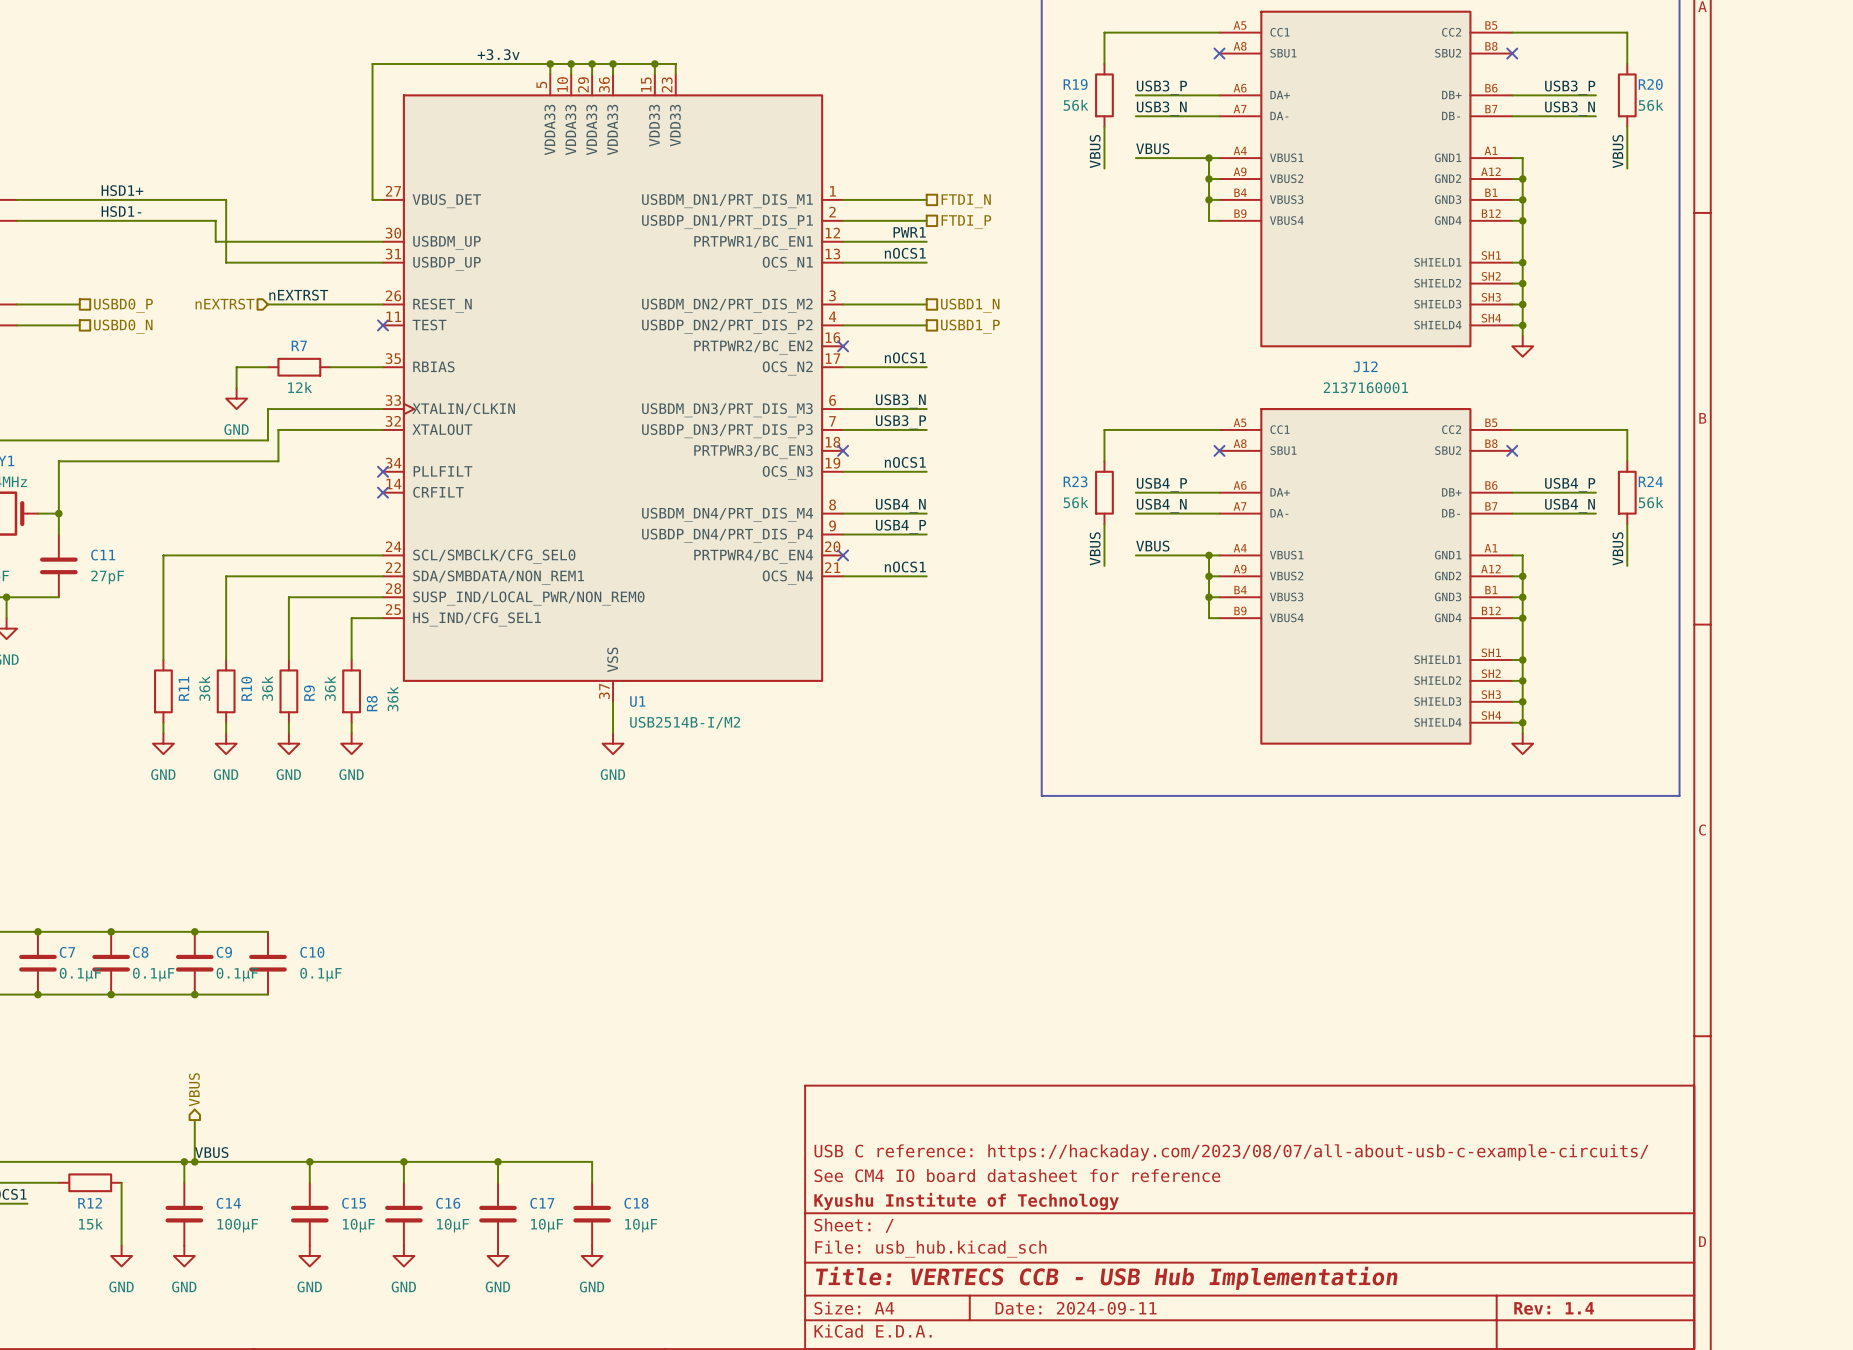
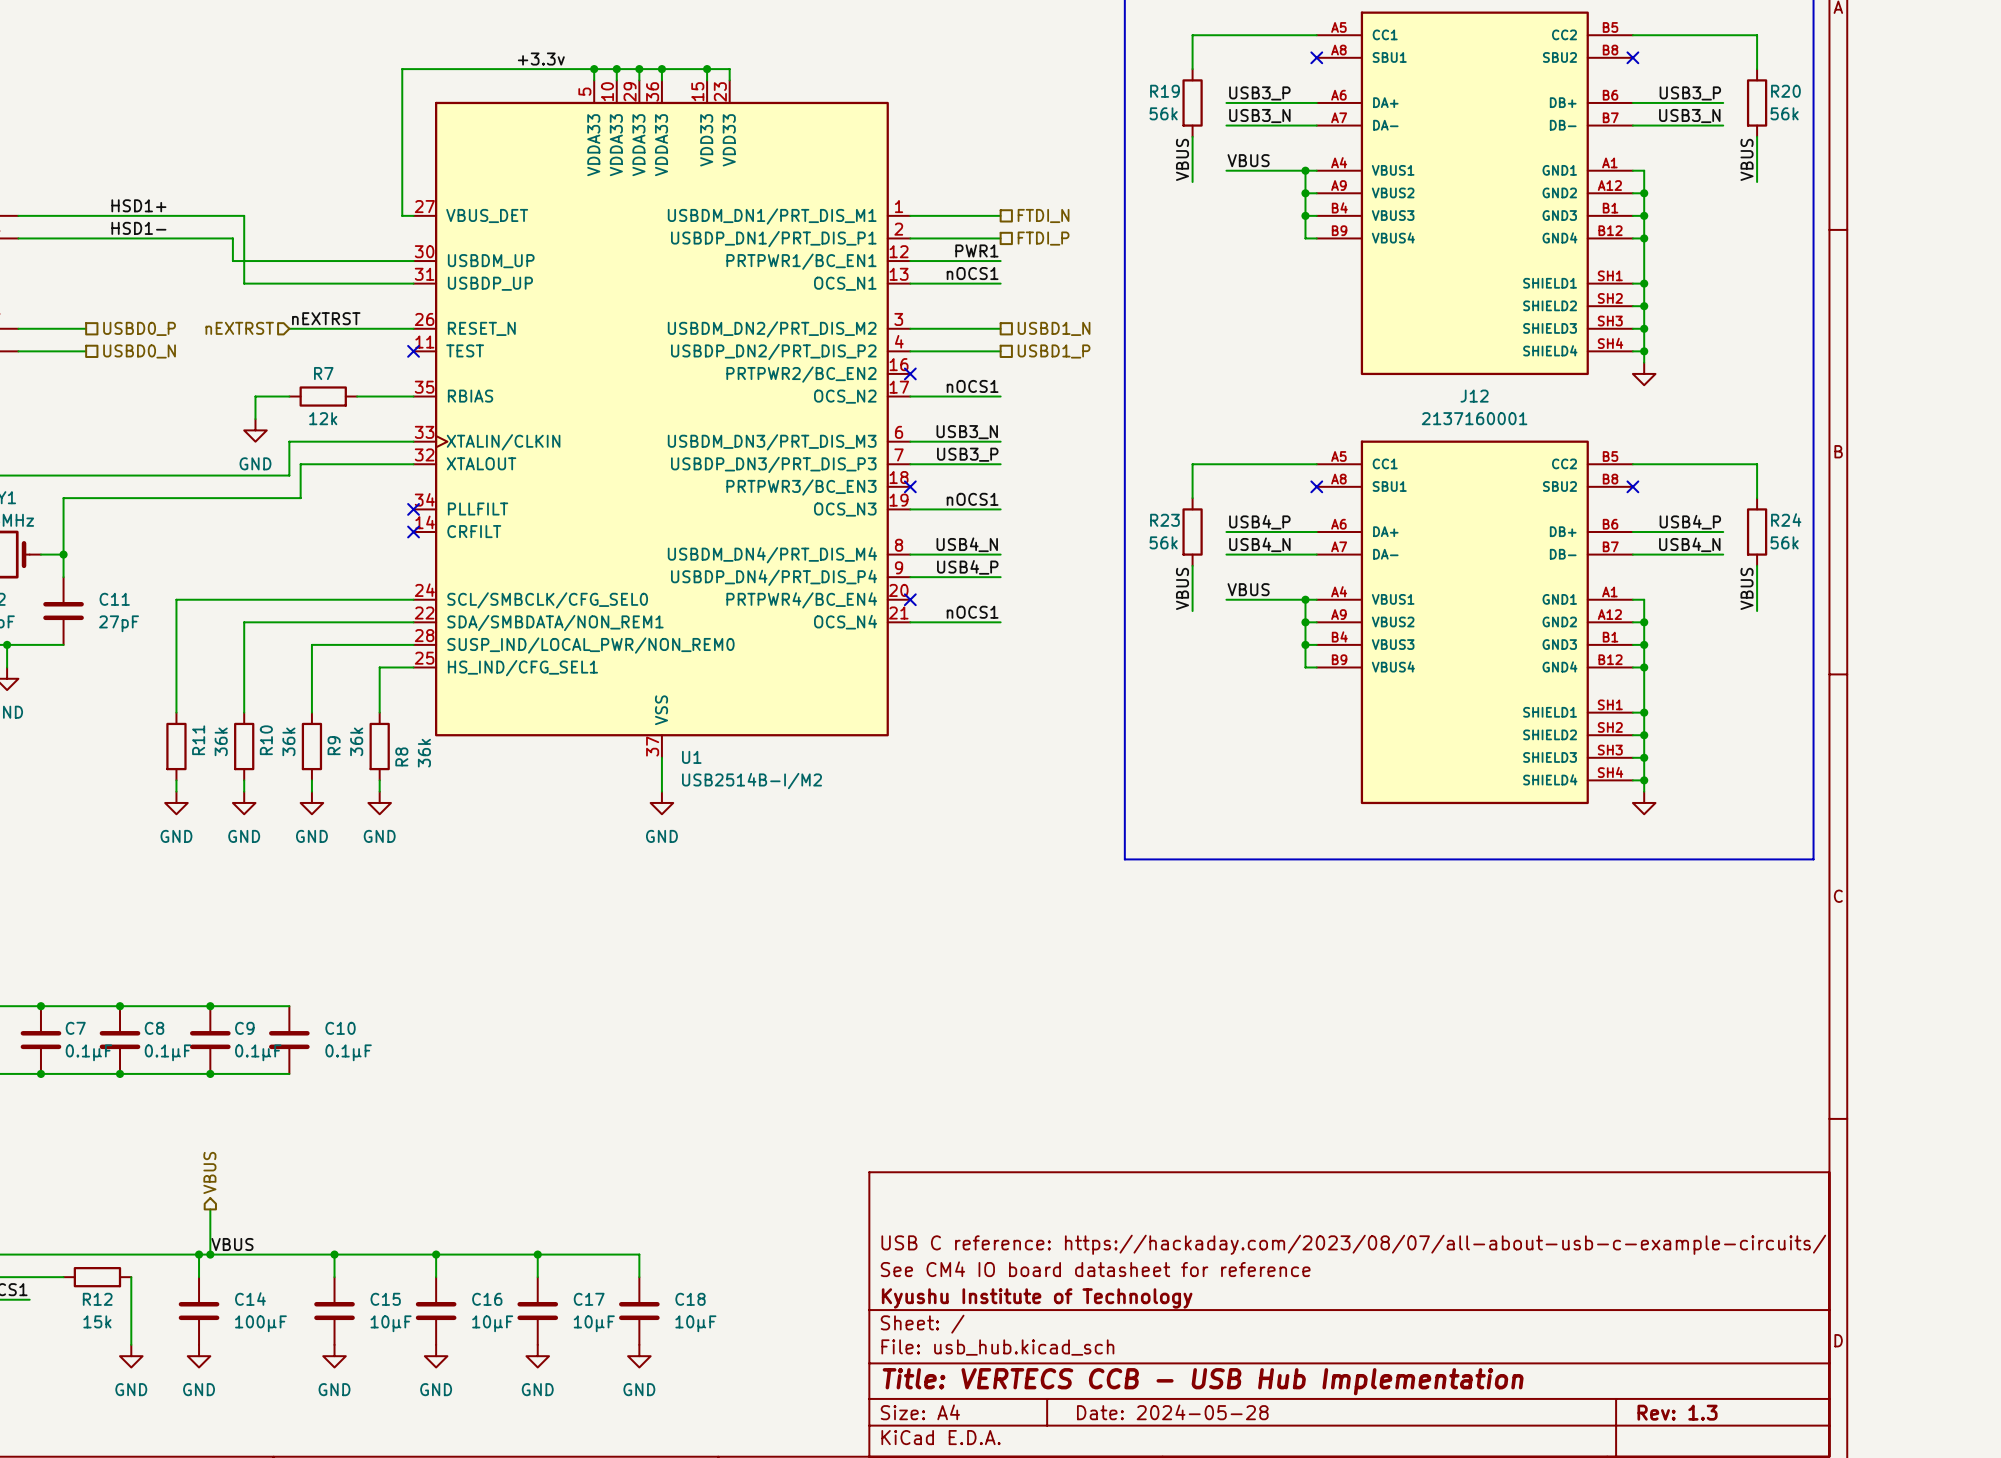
title block: Date: 2024-09-11 (1076, 1308) -> Date: 2024-05-28 (1172, 1412)
title block: Rev: 1.4 (1554, 1308) -> Rev: 1.3 (1677, 1412)

